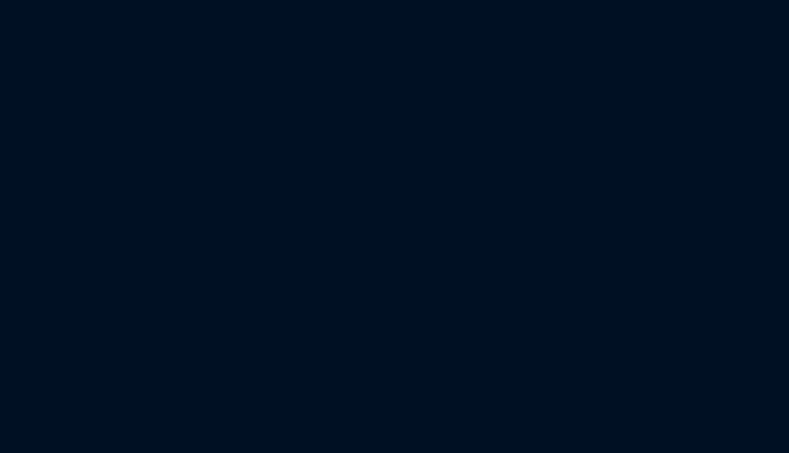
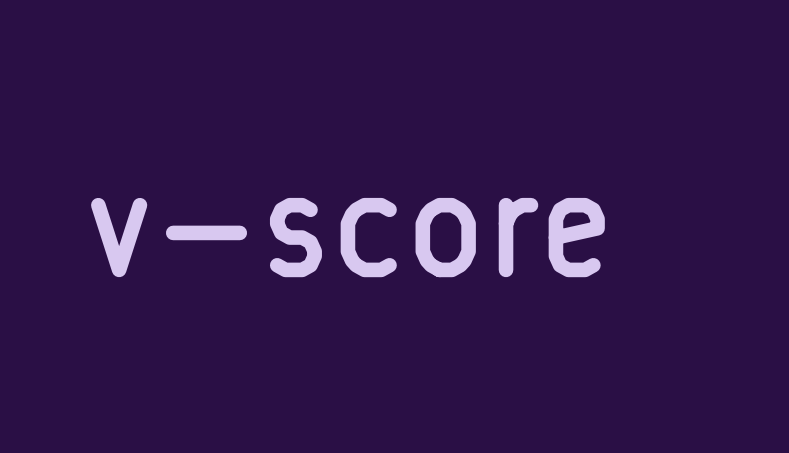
text: none -> v-score (347, 237)

